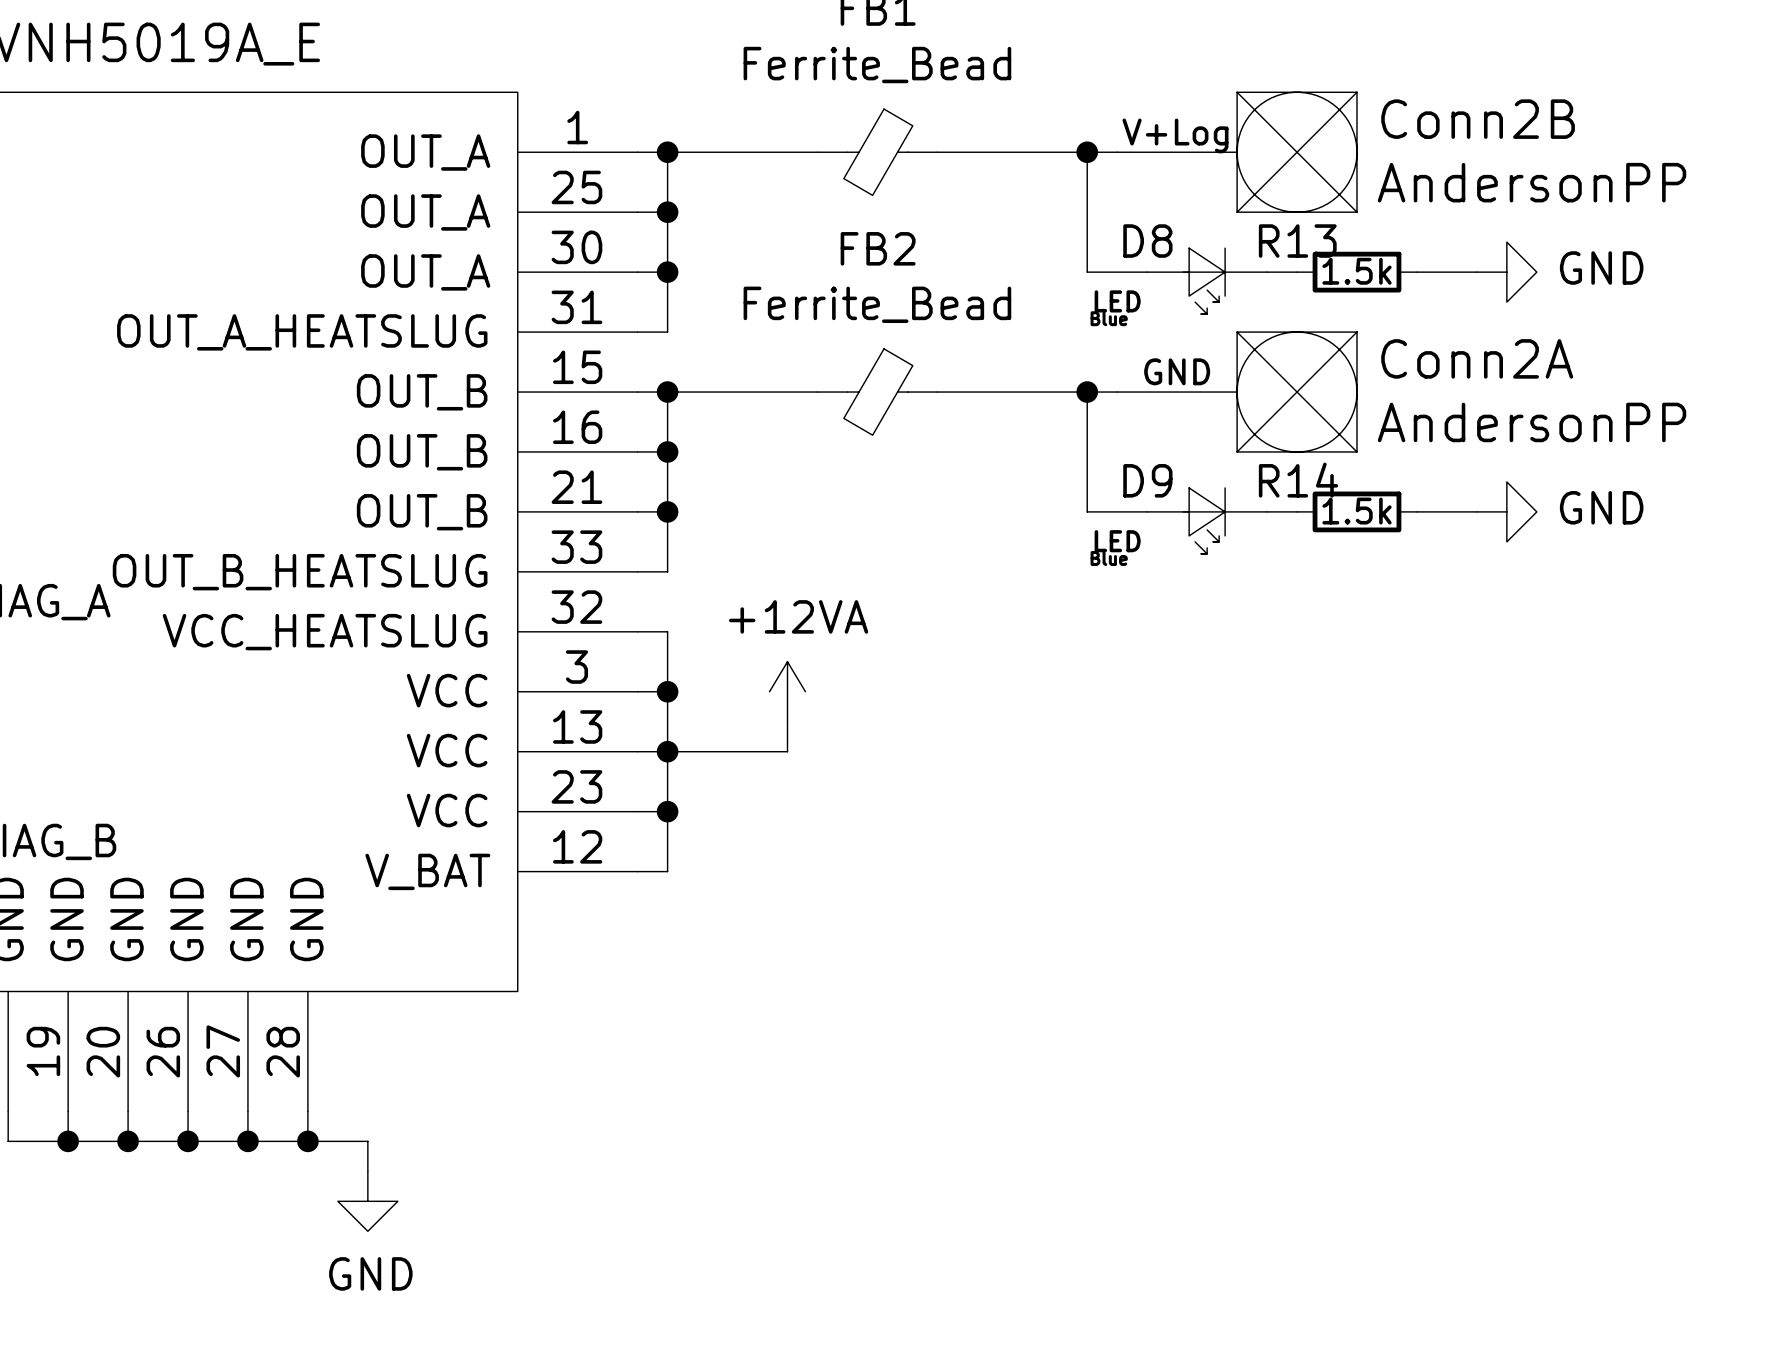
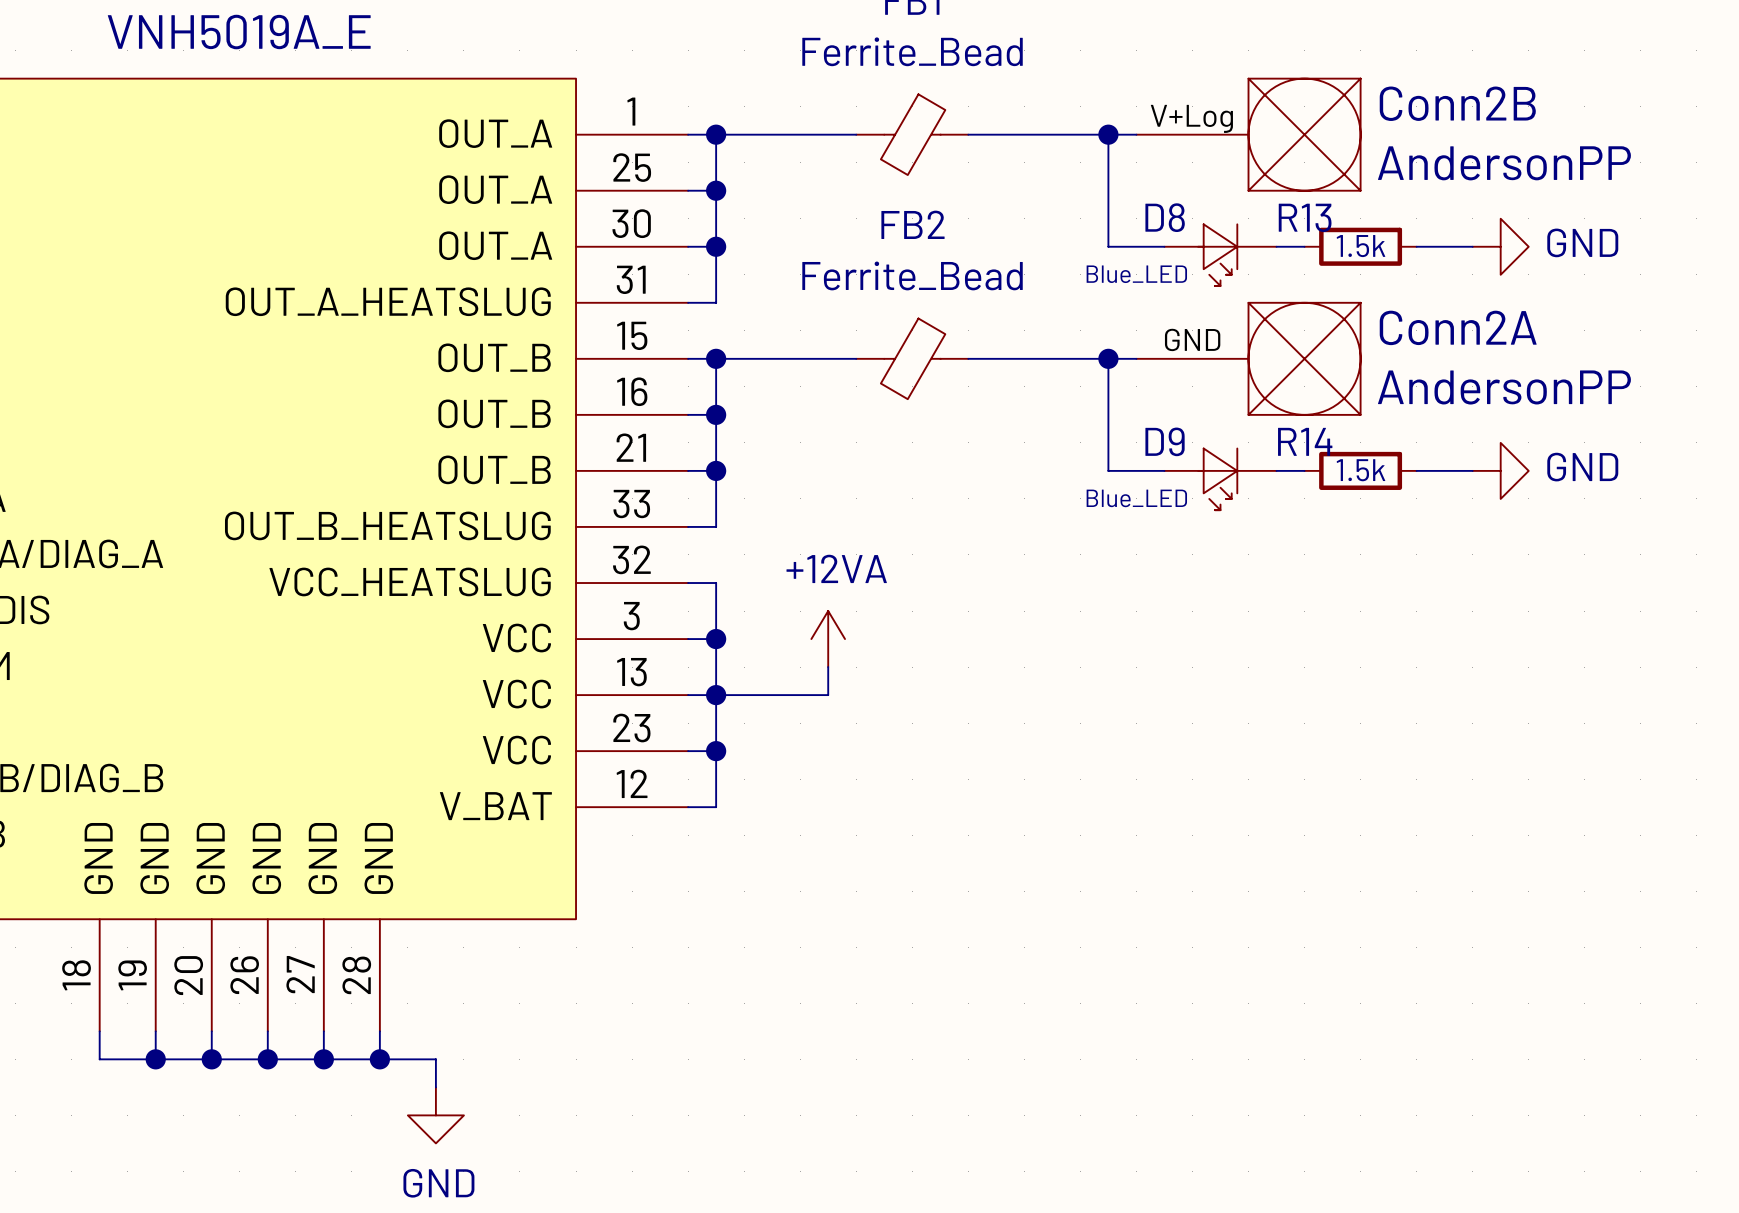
D8 value: LED (1117, 301) -> Blue_LED (1136, 274)
text: Blue (1109, 318) -> none
D9 value: LED (1117, 541) -> Blue_LED (1136, 498)
text: Blue (1109, 558) -> none

